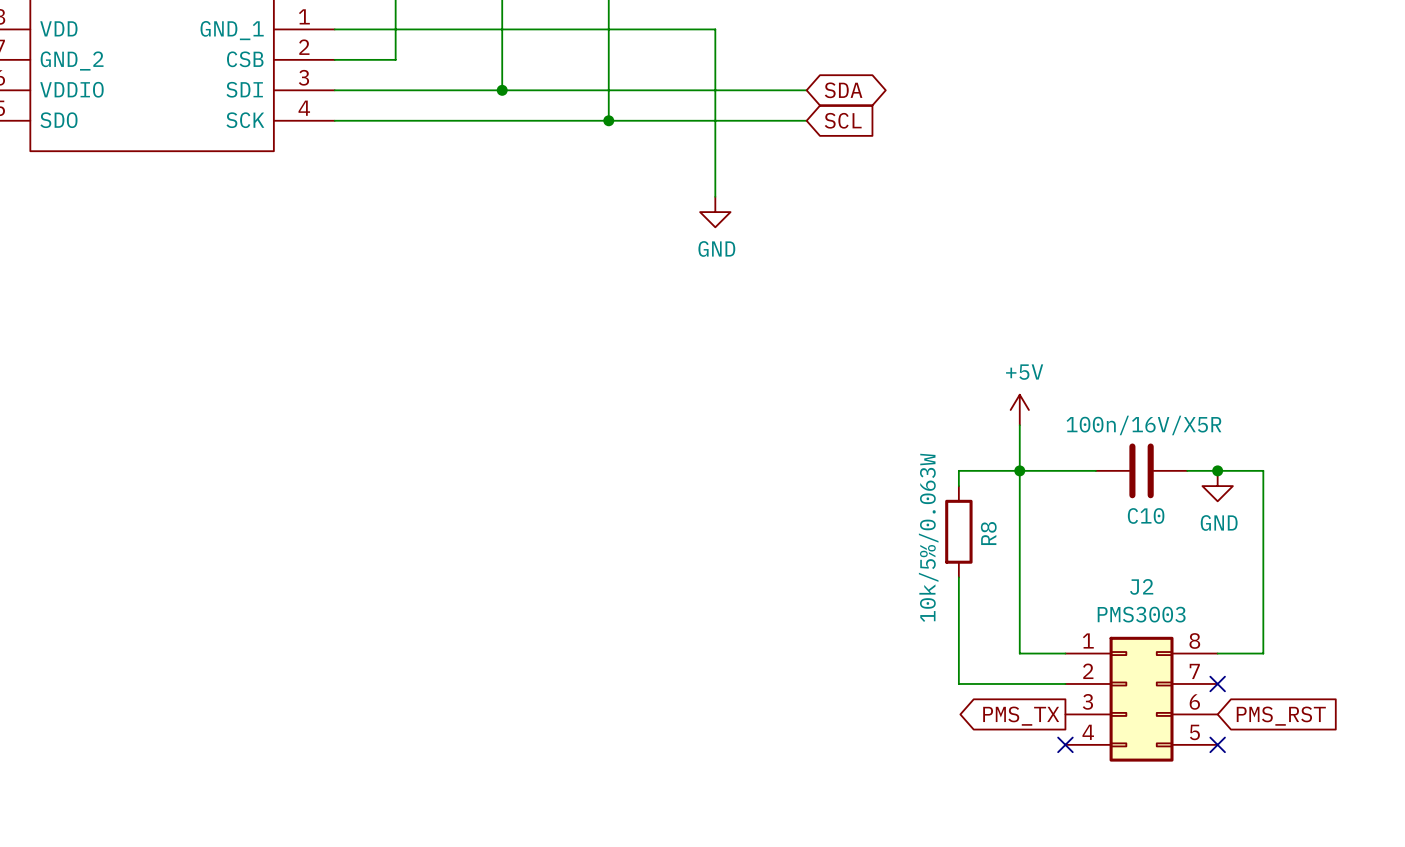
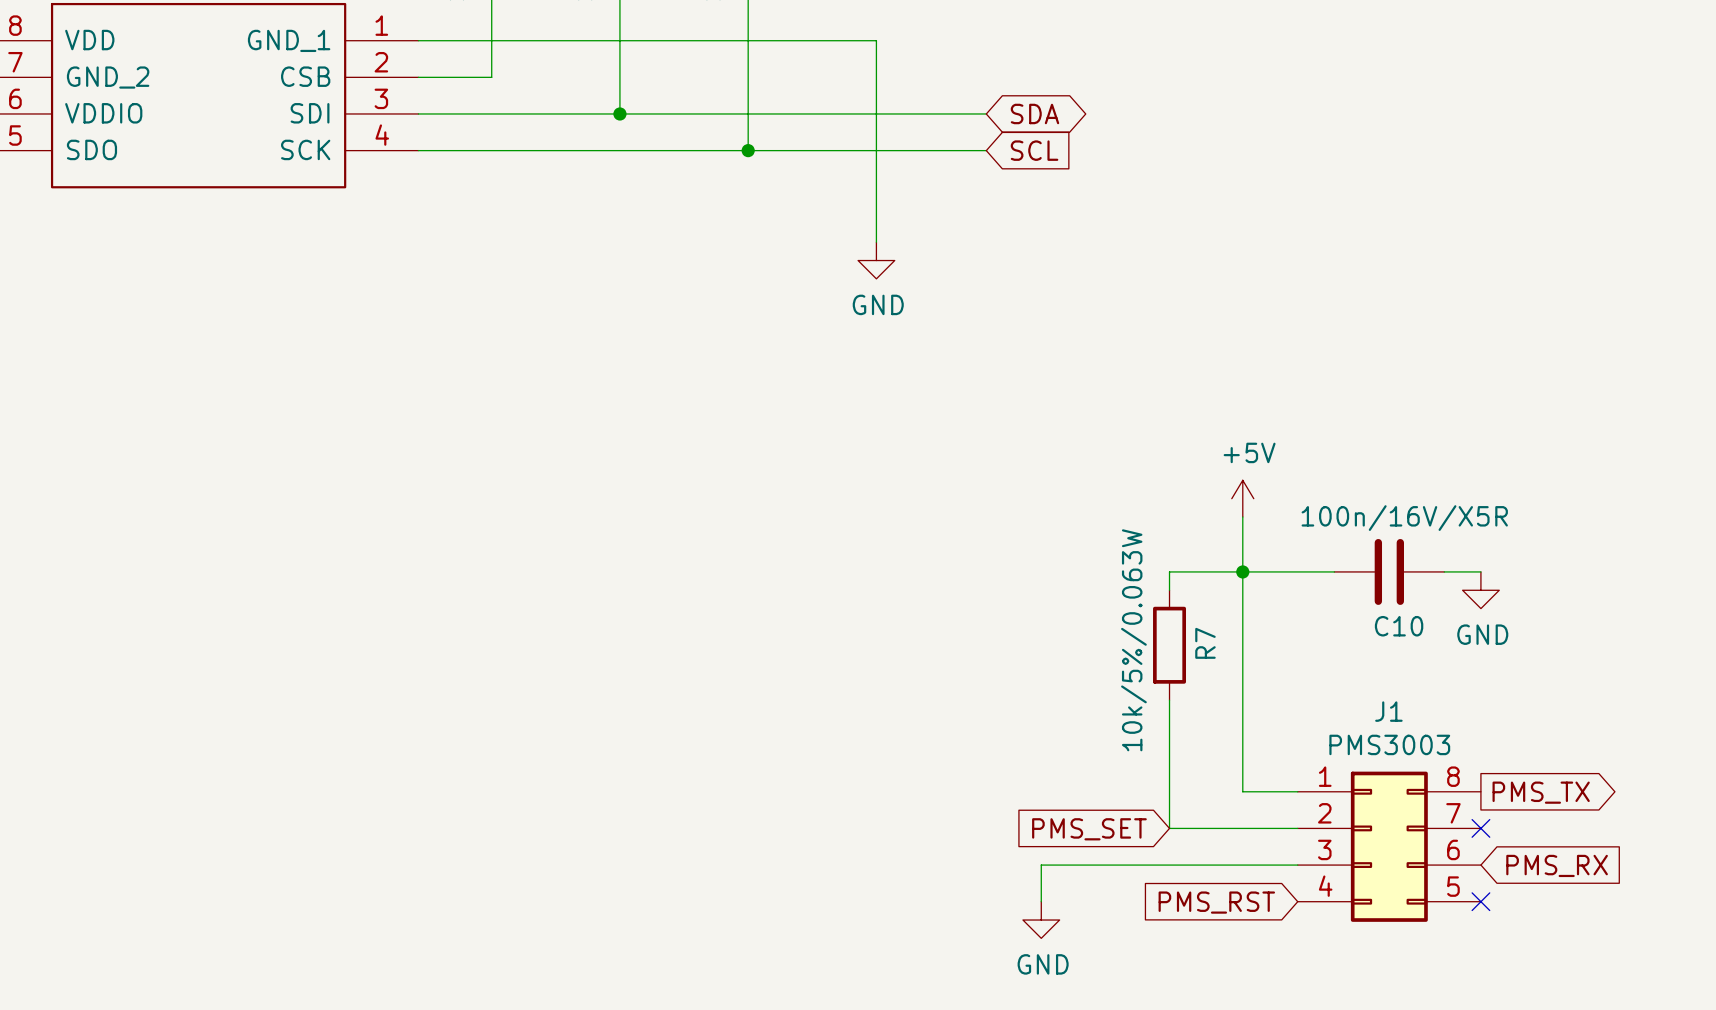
wire: (1217, 470) (1263, 470) (1263, 653) (1217, 653) -> none
junction: (1217, 470) -> none
R8 name: R8 (988, 533) -> R7 (1205, 643)
J2 name: J2 (1141, 586) -> J1 (1388, 711)
global label: none -> PMS_SET (1089, 829)
wire: none -> (1297, 865) (1041, 865) (1041, 901)
global label rotation: 0° (1021, 716) -> 180° (1541, 792)
global label position: PMS_TX (1021, 716) -> PMS_TX (1541, 792)
global label: PMS_RST (1281, 716) -> PMS_RX (1557, 865)
no-connect mark: (1065, 744) -> none
global label: none -> PMS_RST (1216, 902)
power symbol: none -> GND (1041, 920)

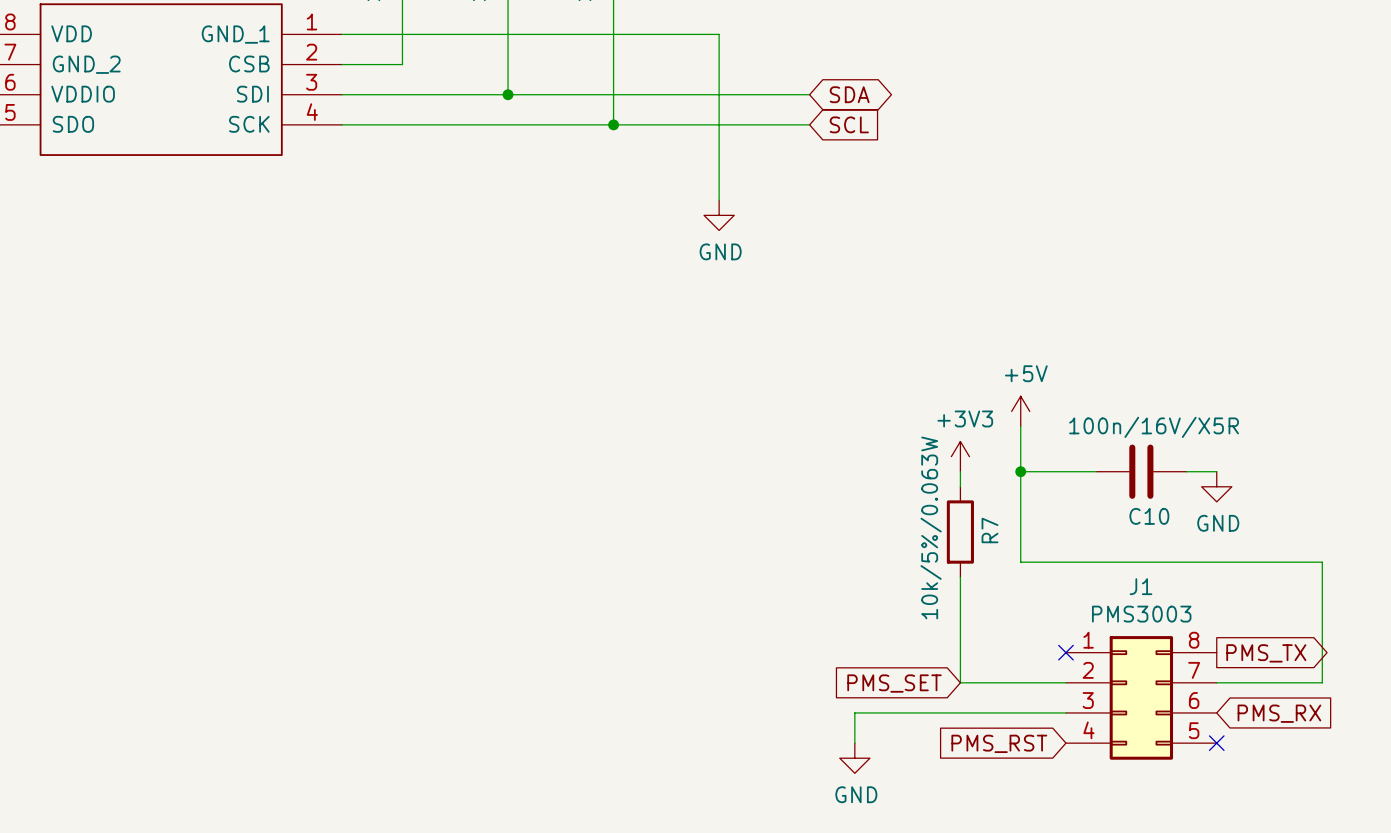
power symbol: none -> +3V3 (960, 456)
wire: (1169, 571) (1242, 571) -> none
wire: (1242, 681) (1242, 791) (1297, 791) -> (1020, 562) (1322, 562) (1322, 682) (1216, 682)
no-connect mark: none -> (1065, 652)
no-connect mark: (1480, 828) -> none

